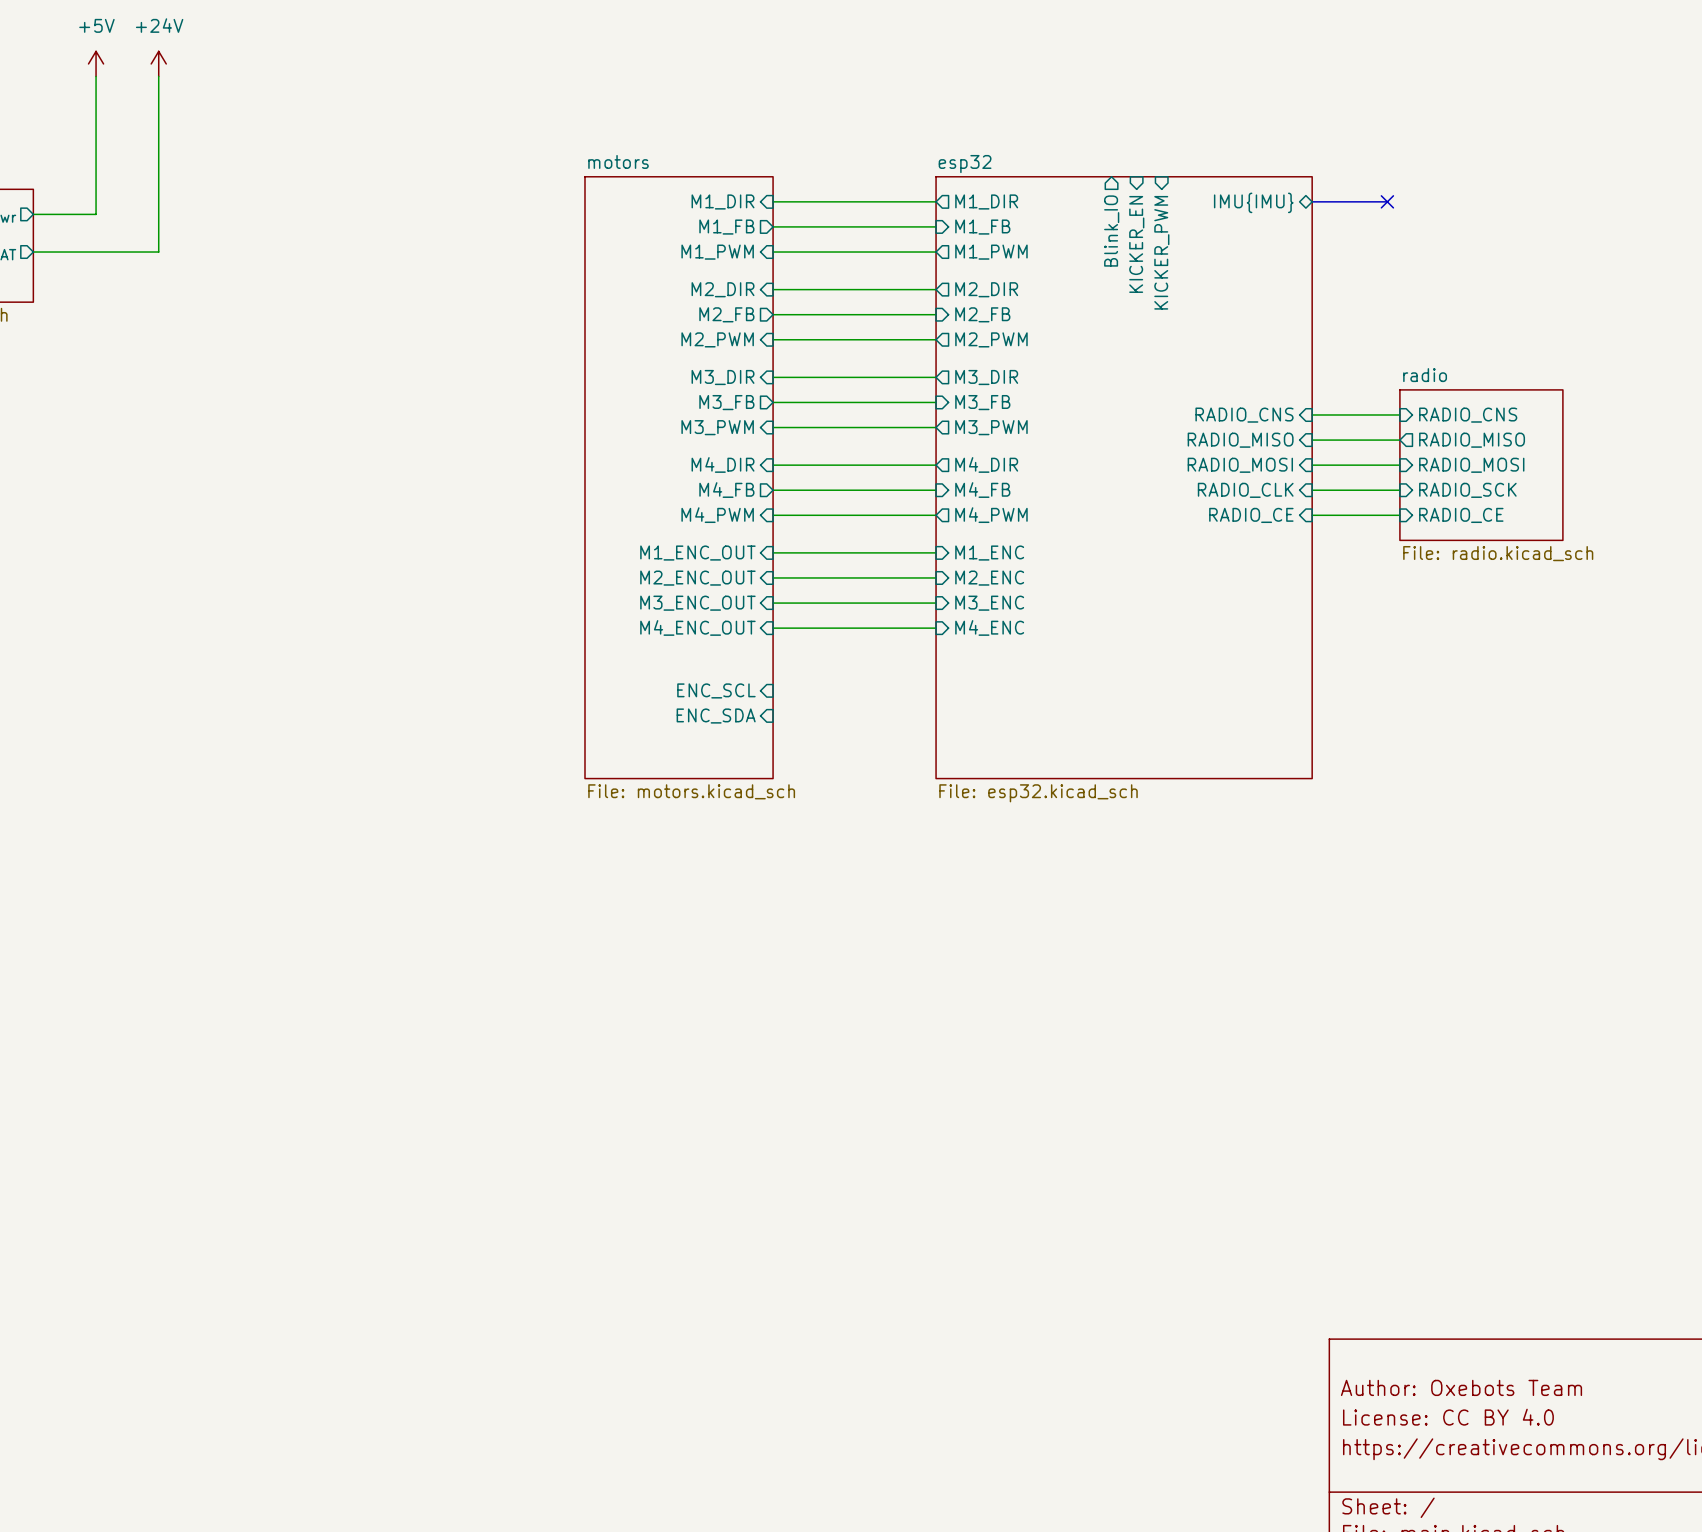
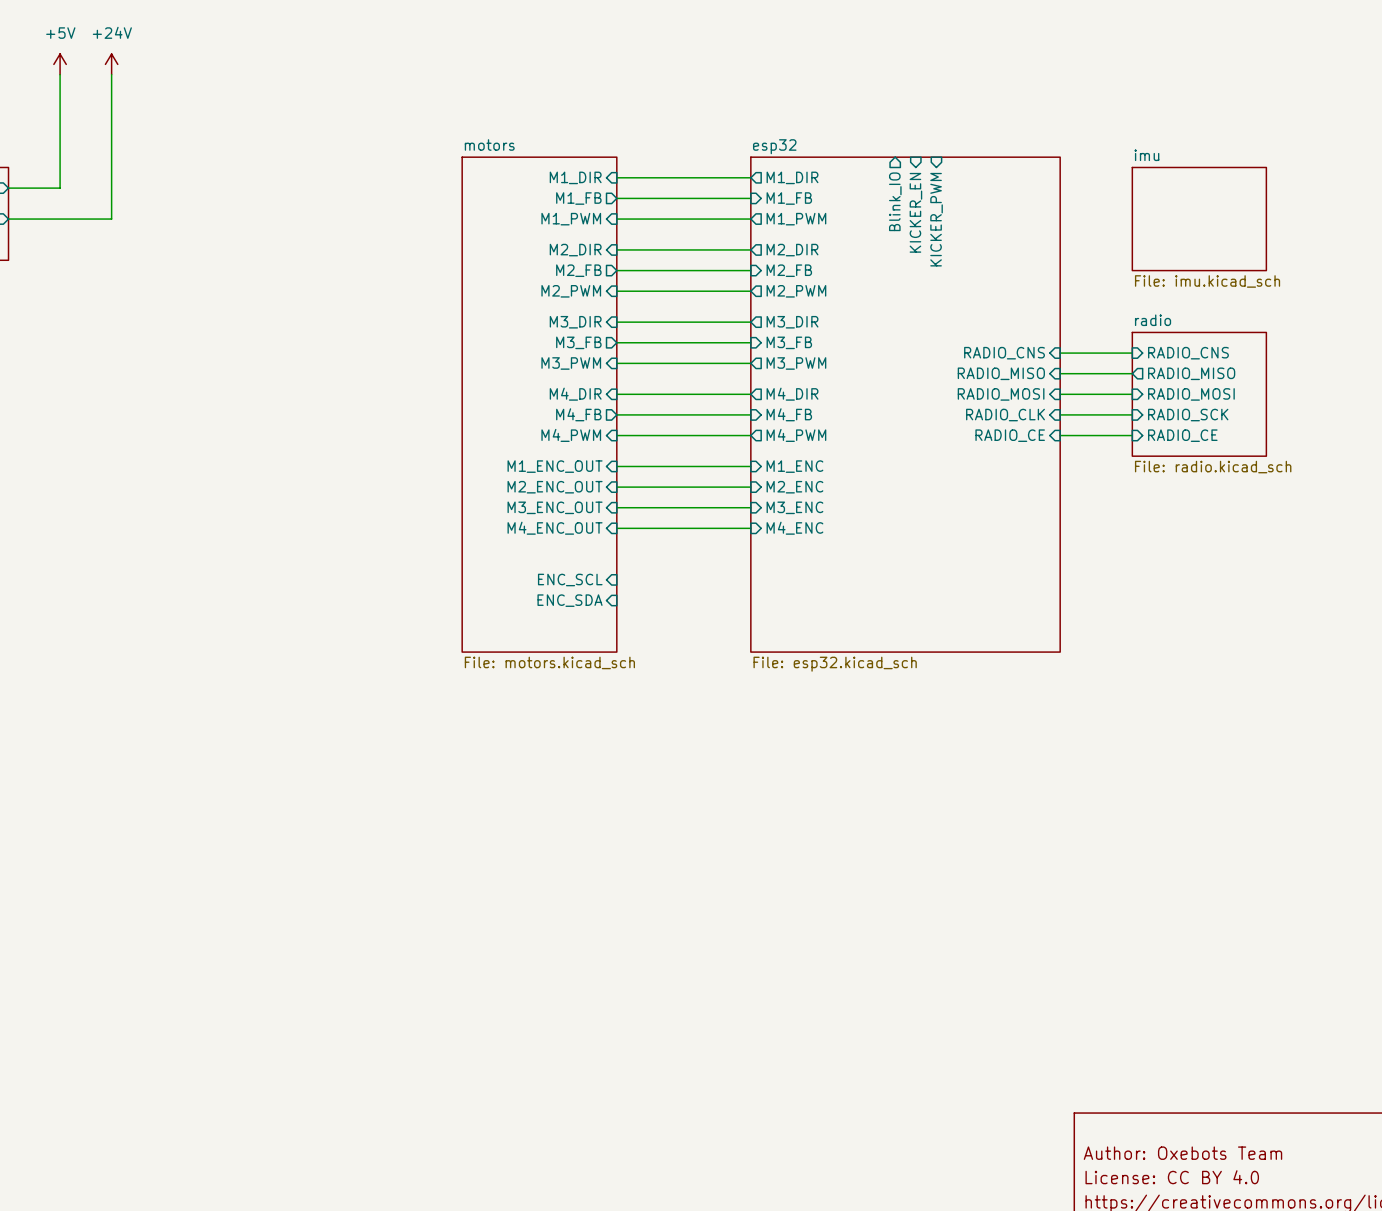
bus: (1312, 201) (1387, 201) -> none
no-connect mark: (1387, 201) -> none
sheet pin: IMU{IMU} (1253, 202) -> none
sheet imu: none -> File: imu.kicad_sch (1199, 219)

